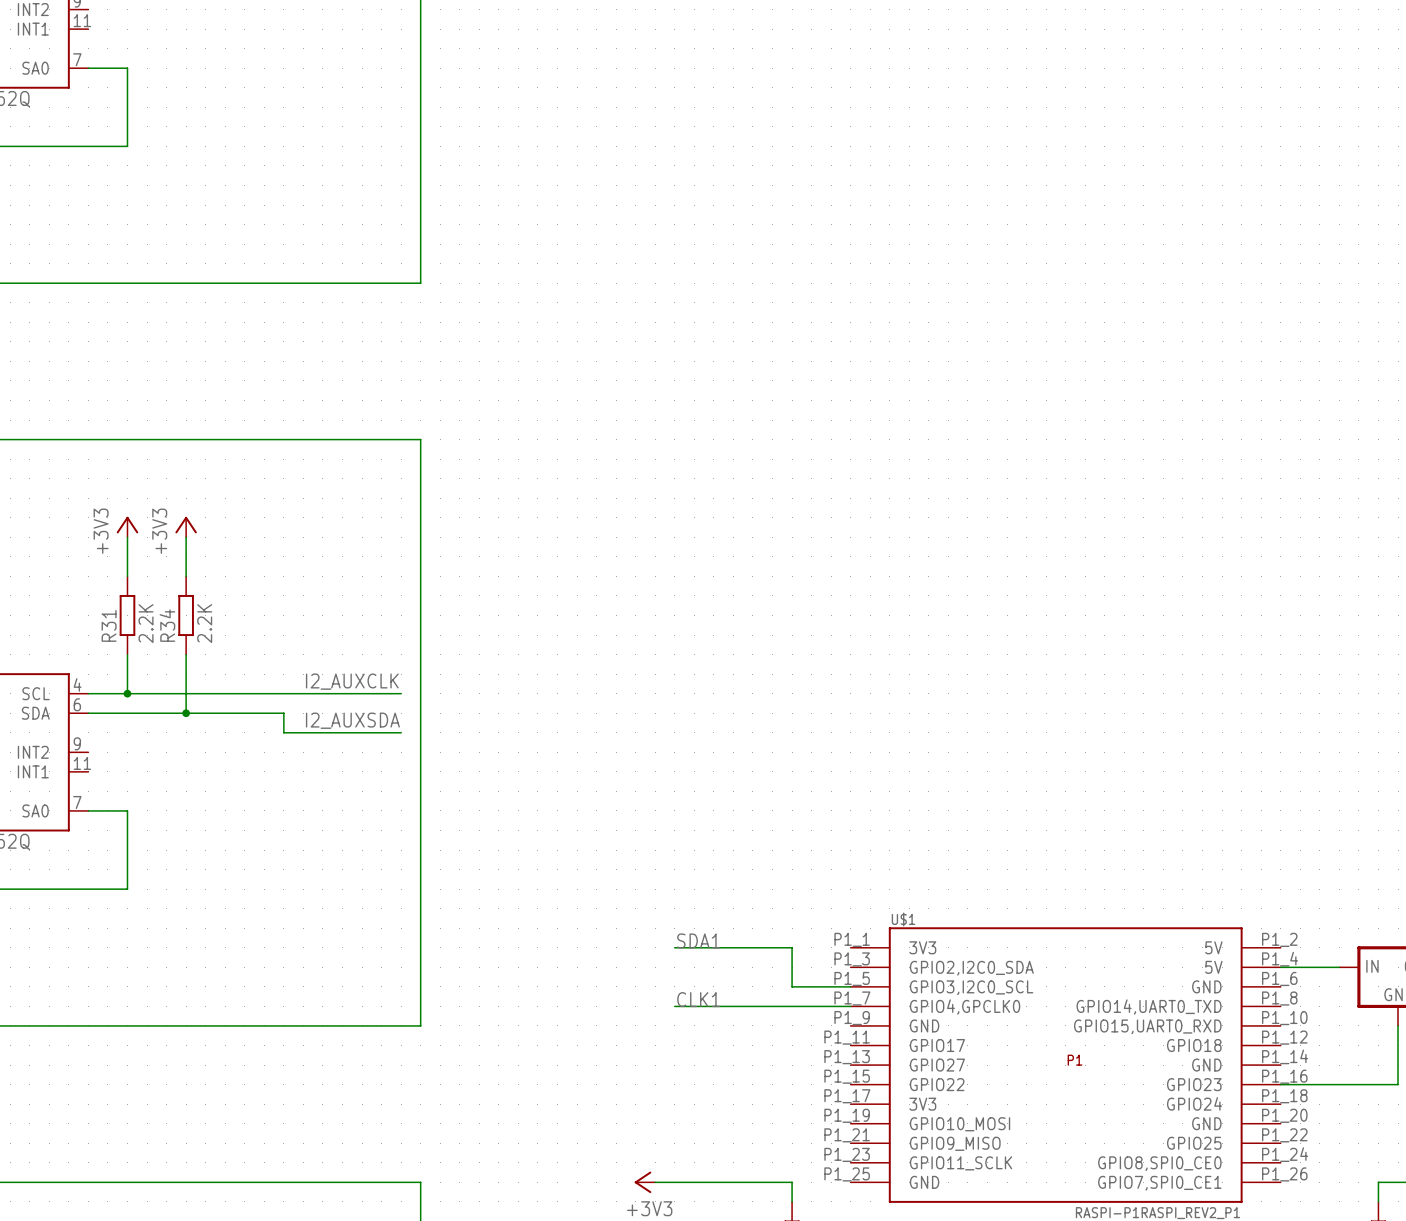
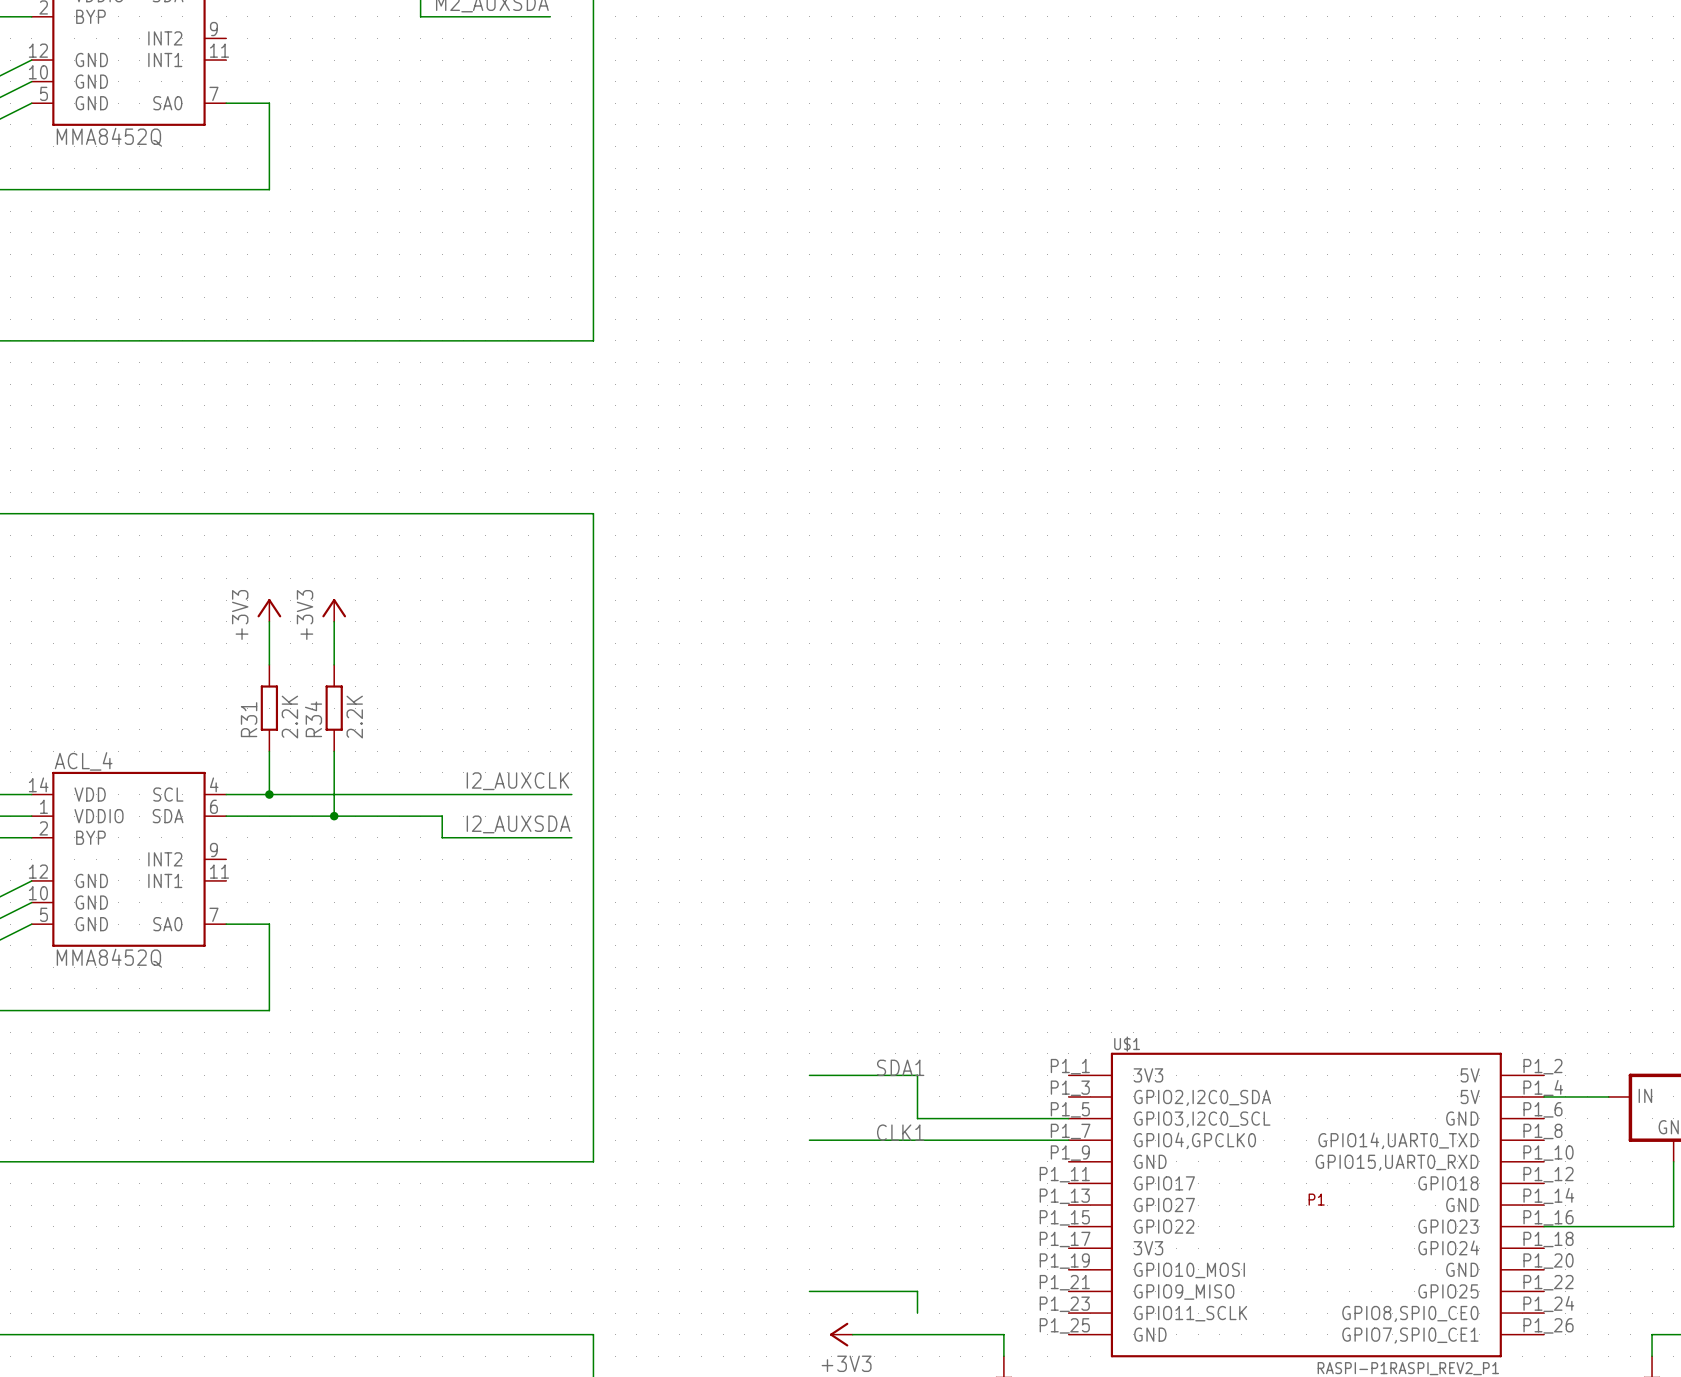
wire: none -> (809, 1075) (874, 1075)
wire: (713, 947) (792, 947) (792, 986) -> (917, 1075) (917, 1118) (1003, 1118)
wire: none -> (809, 1140) (874, 1140)
wire: none -> (809, 1291) (917, 1291) (917, 1313)

